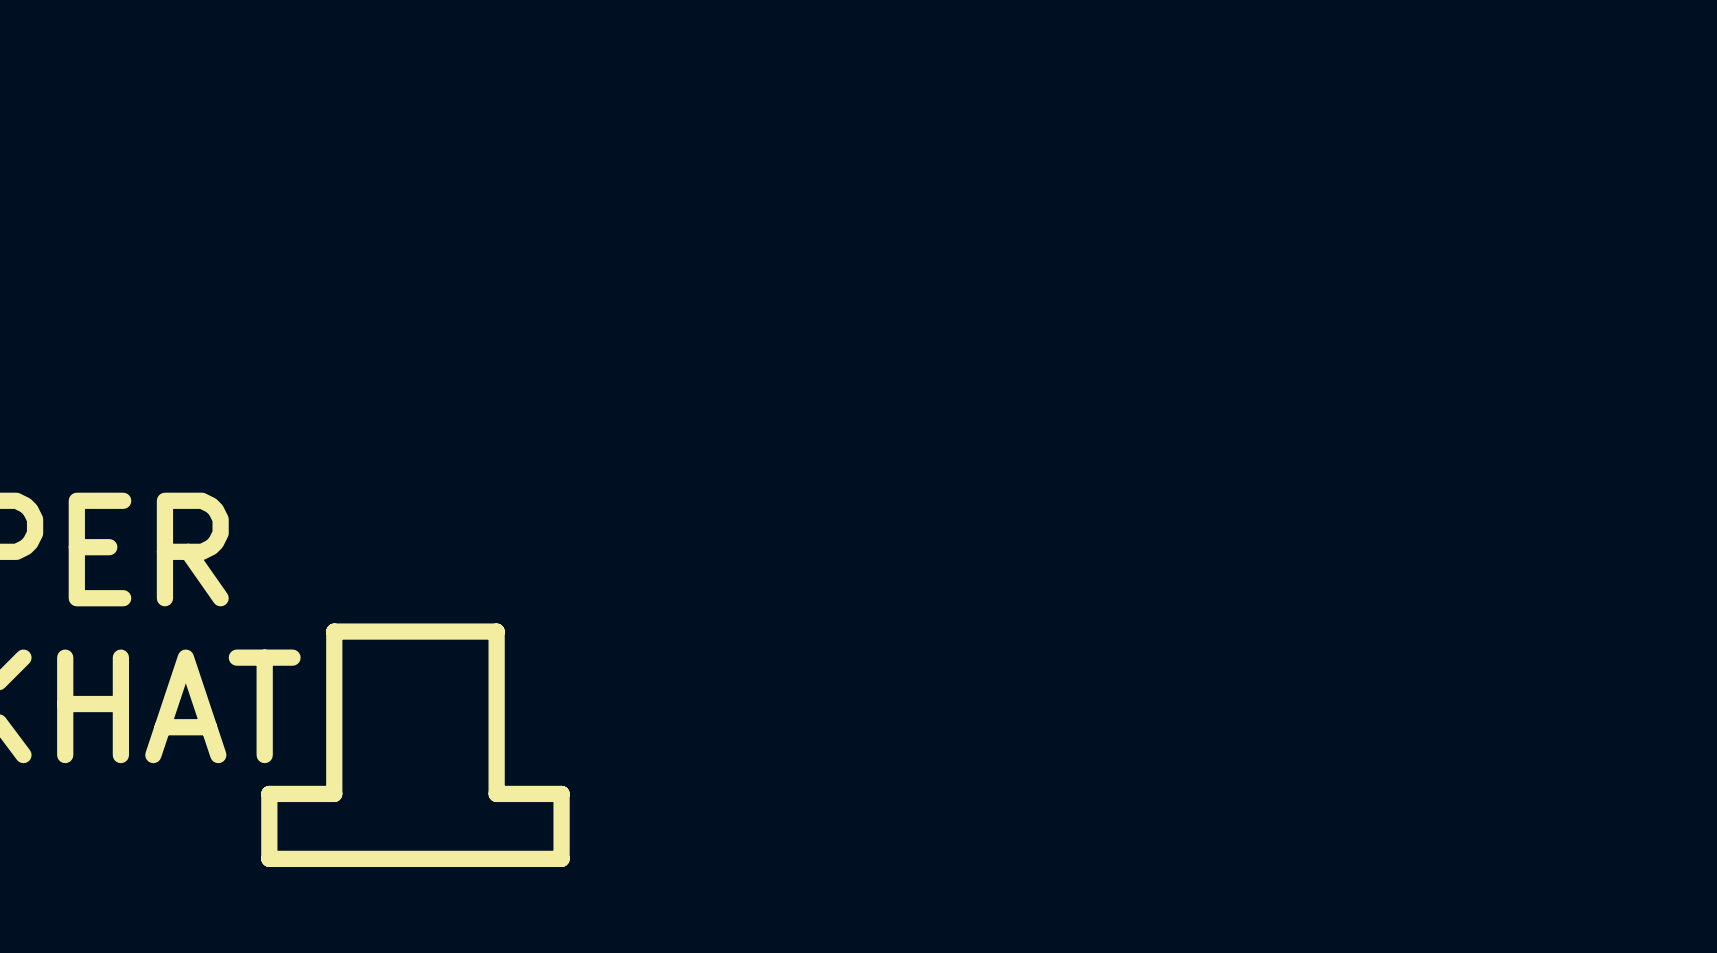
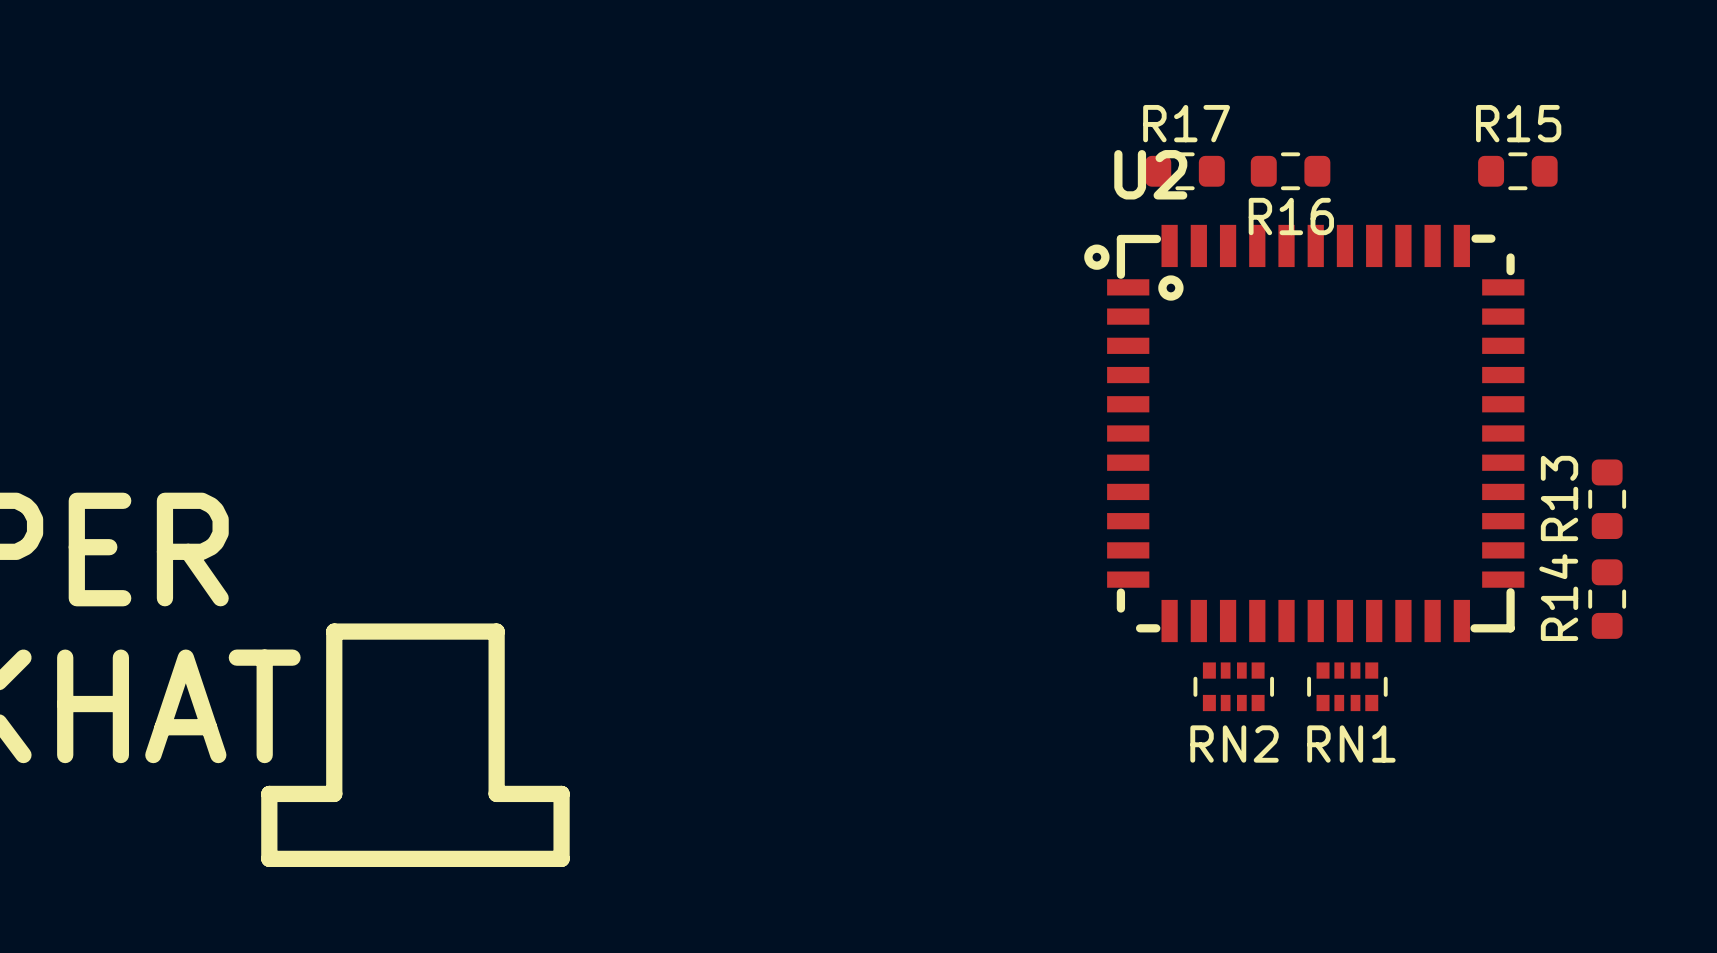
R17: none -> (1185, 171)
R16: none -> (1290, 171)
R15: none -> (1517, 171)
U2: none -> (1304, 433)
R13: none -> (1607, 499)
R14: none -> (1607, 599)
RN2: none -> (1233, 686)
RN1: none -> (1347, 686)

